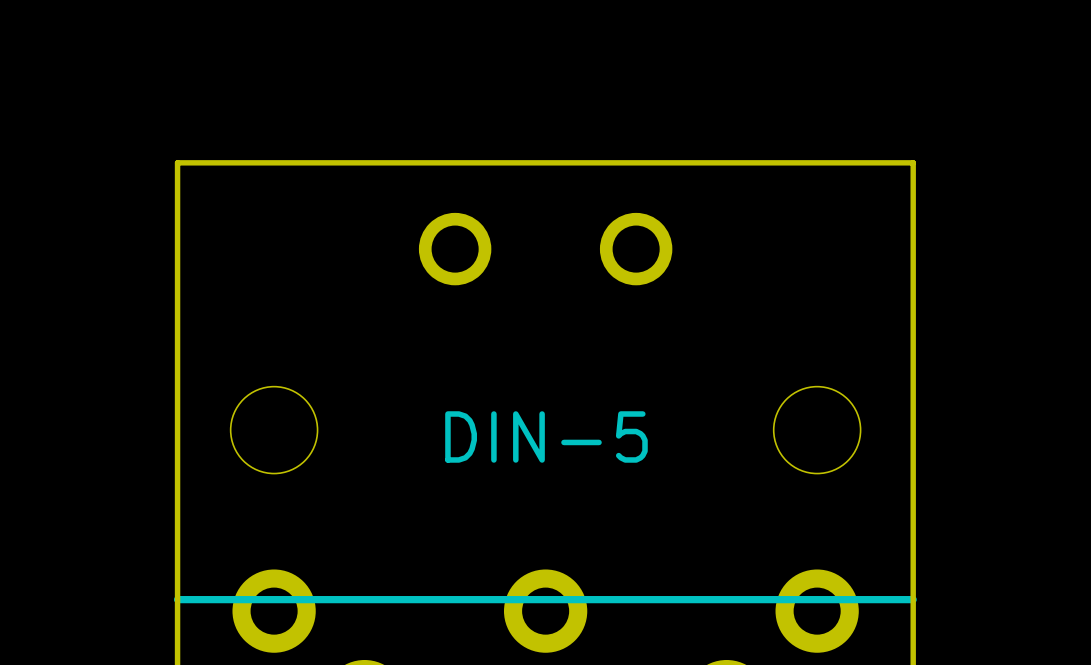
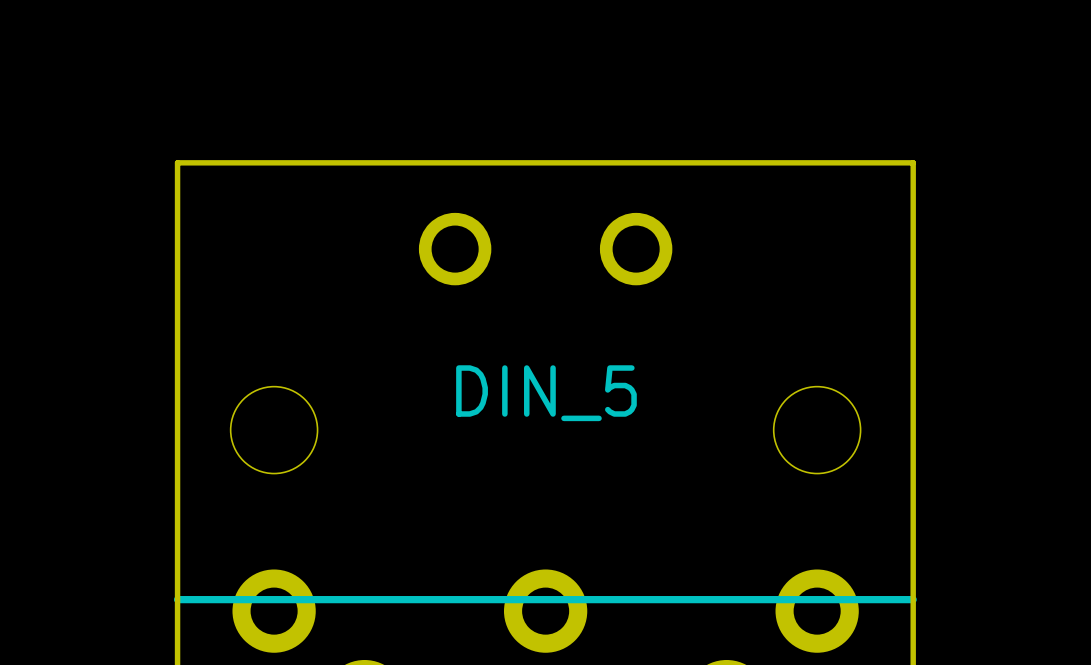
part value: DIN-5 (546, 436) -> DIN_5 (546, 393)

